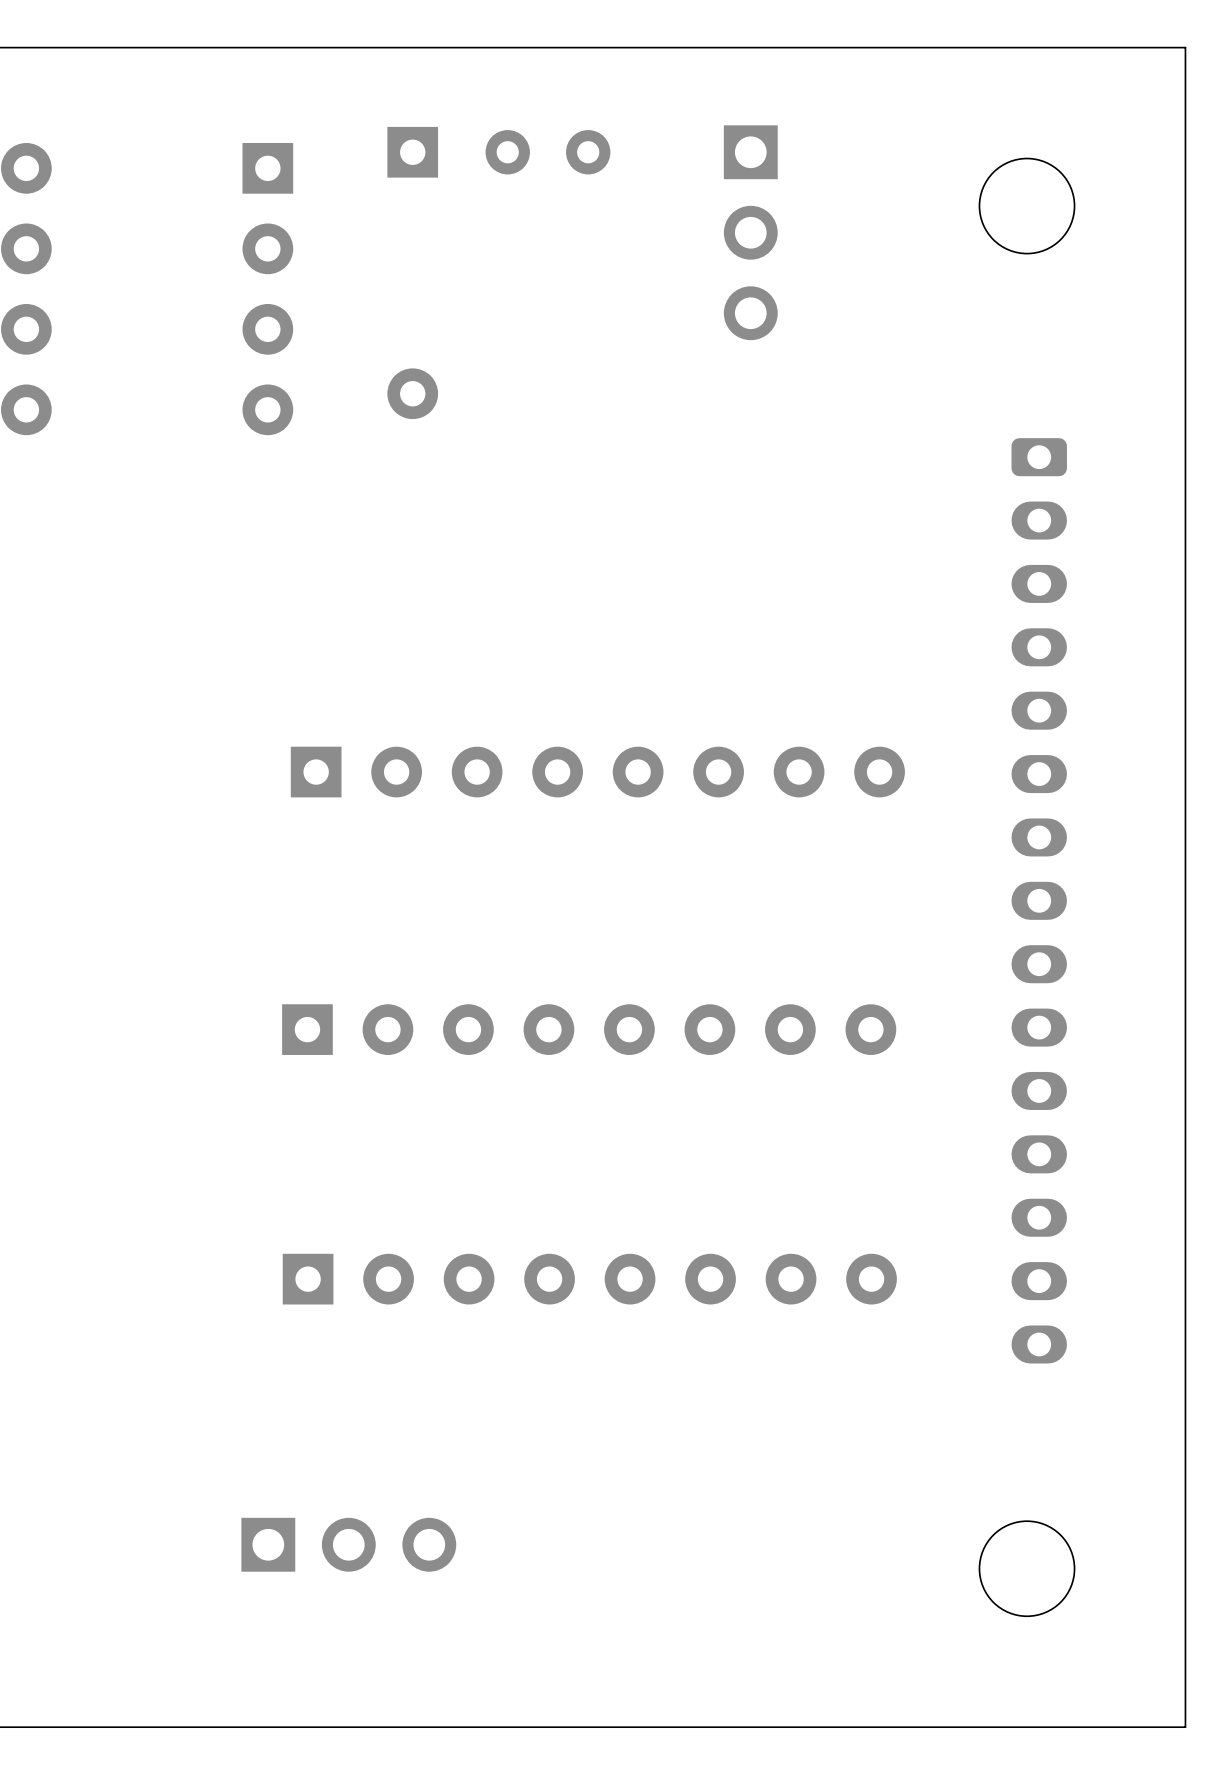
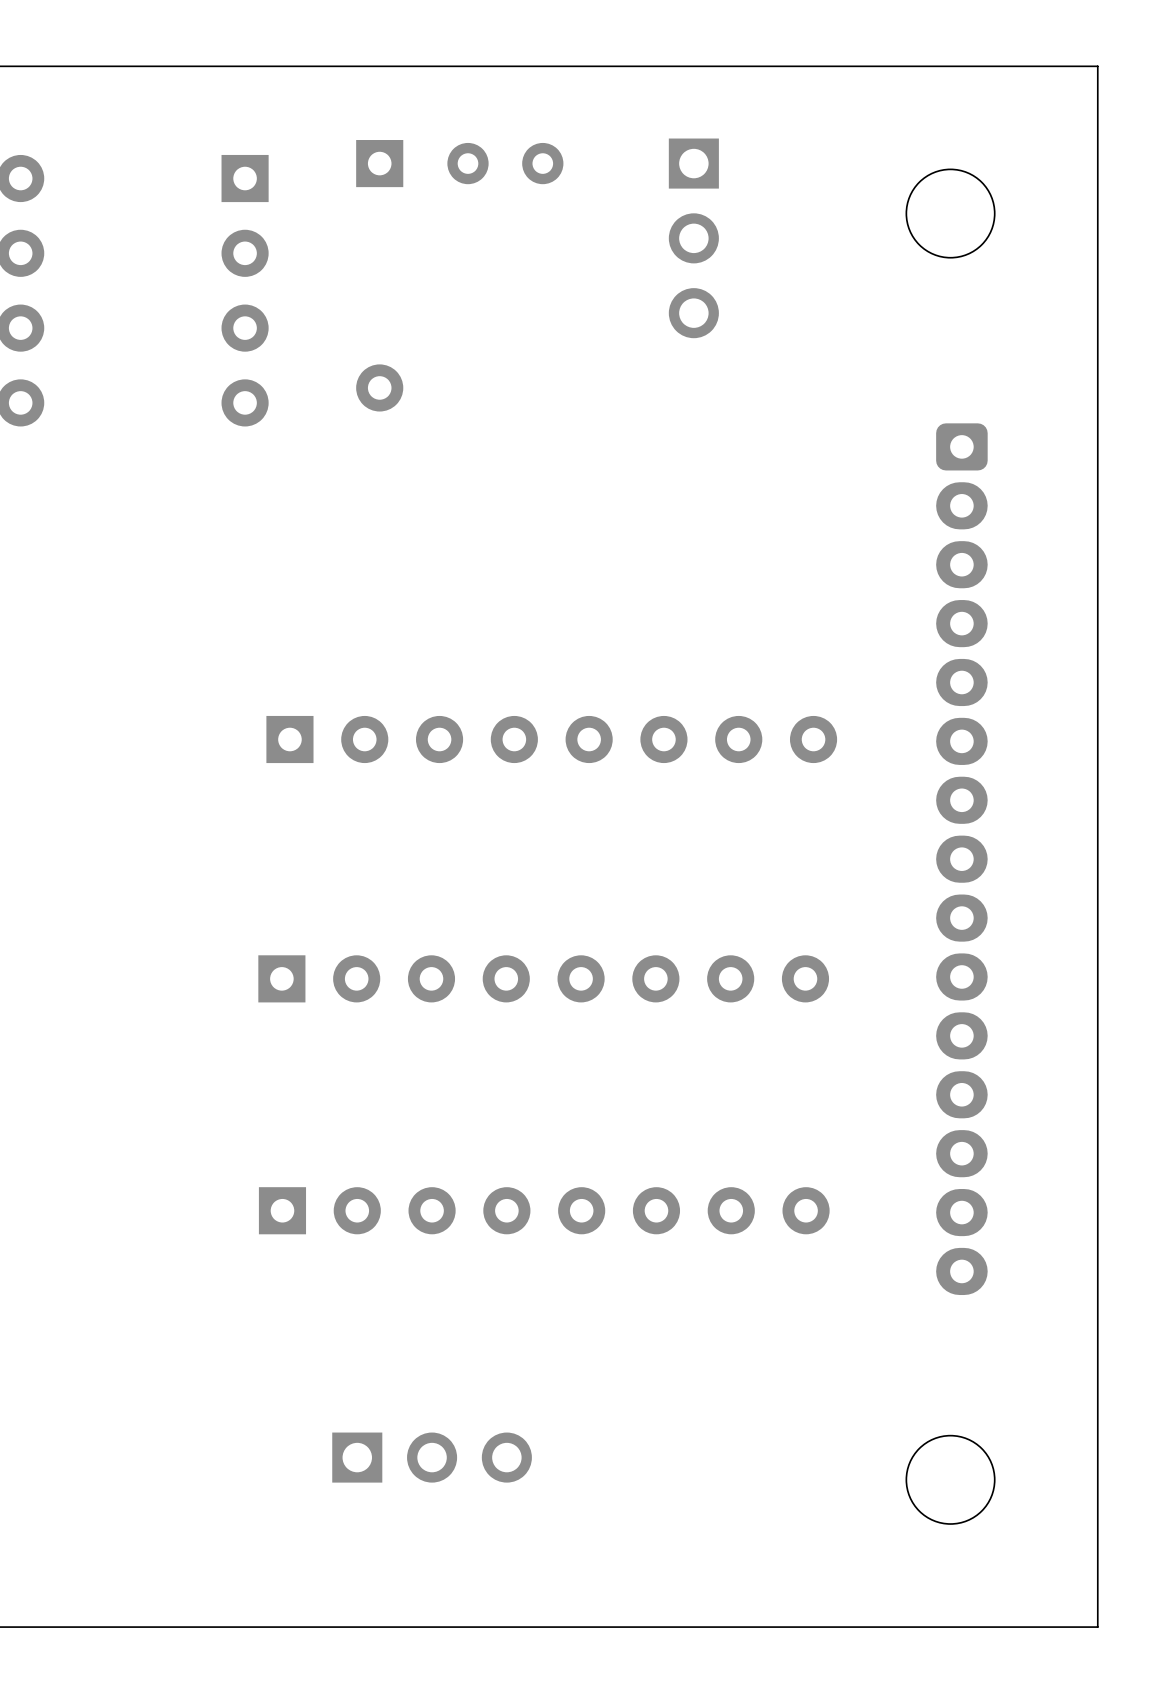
part footprint: [1011, 438, 1067, 1364] -> [936, 423, 988, 1296]
part position: (348, 1544) -> (432, 1457)

